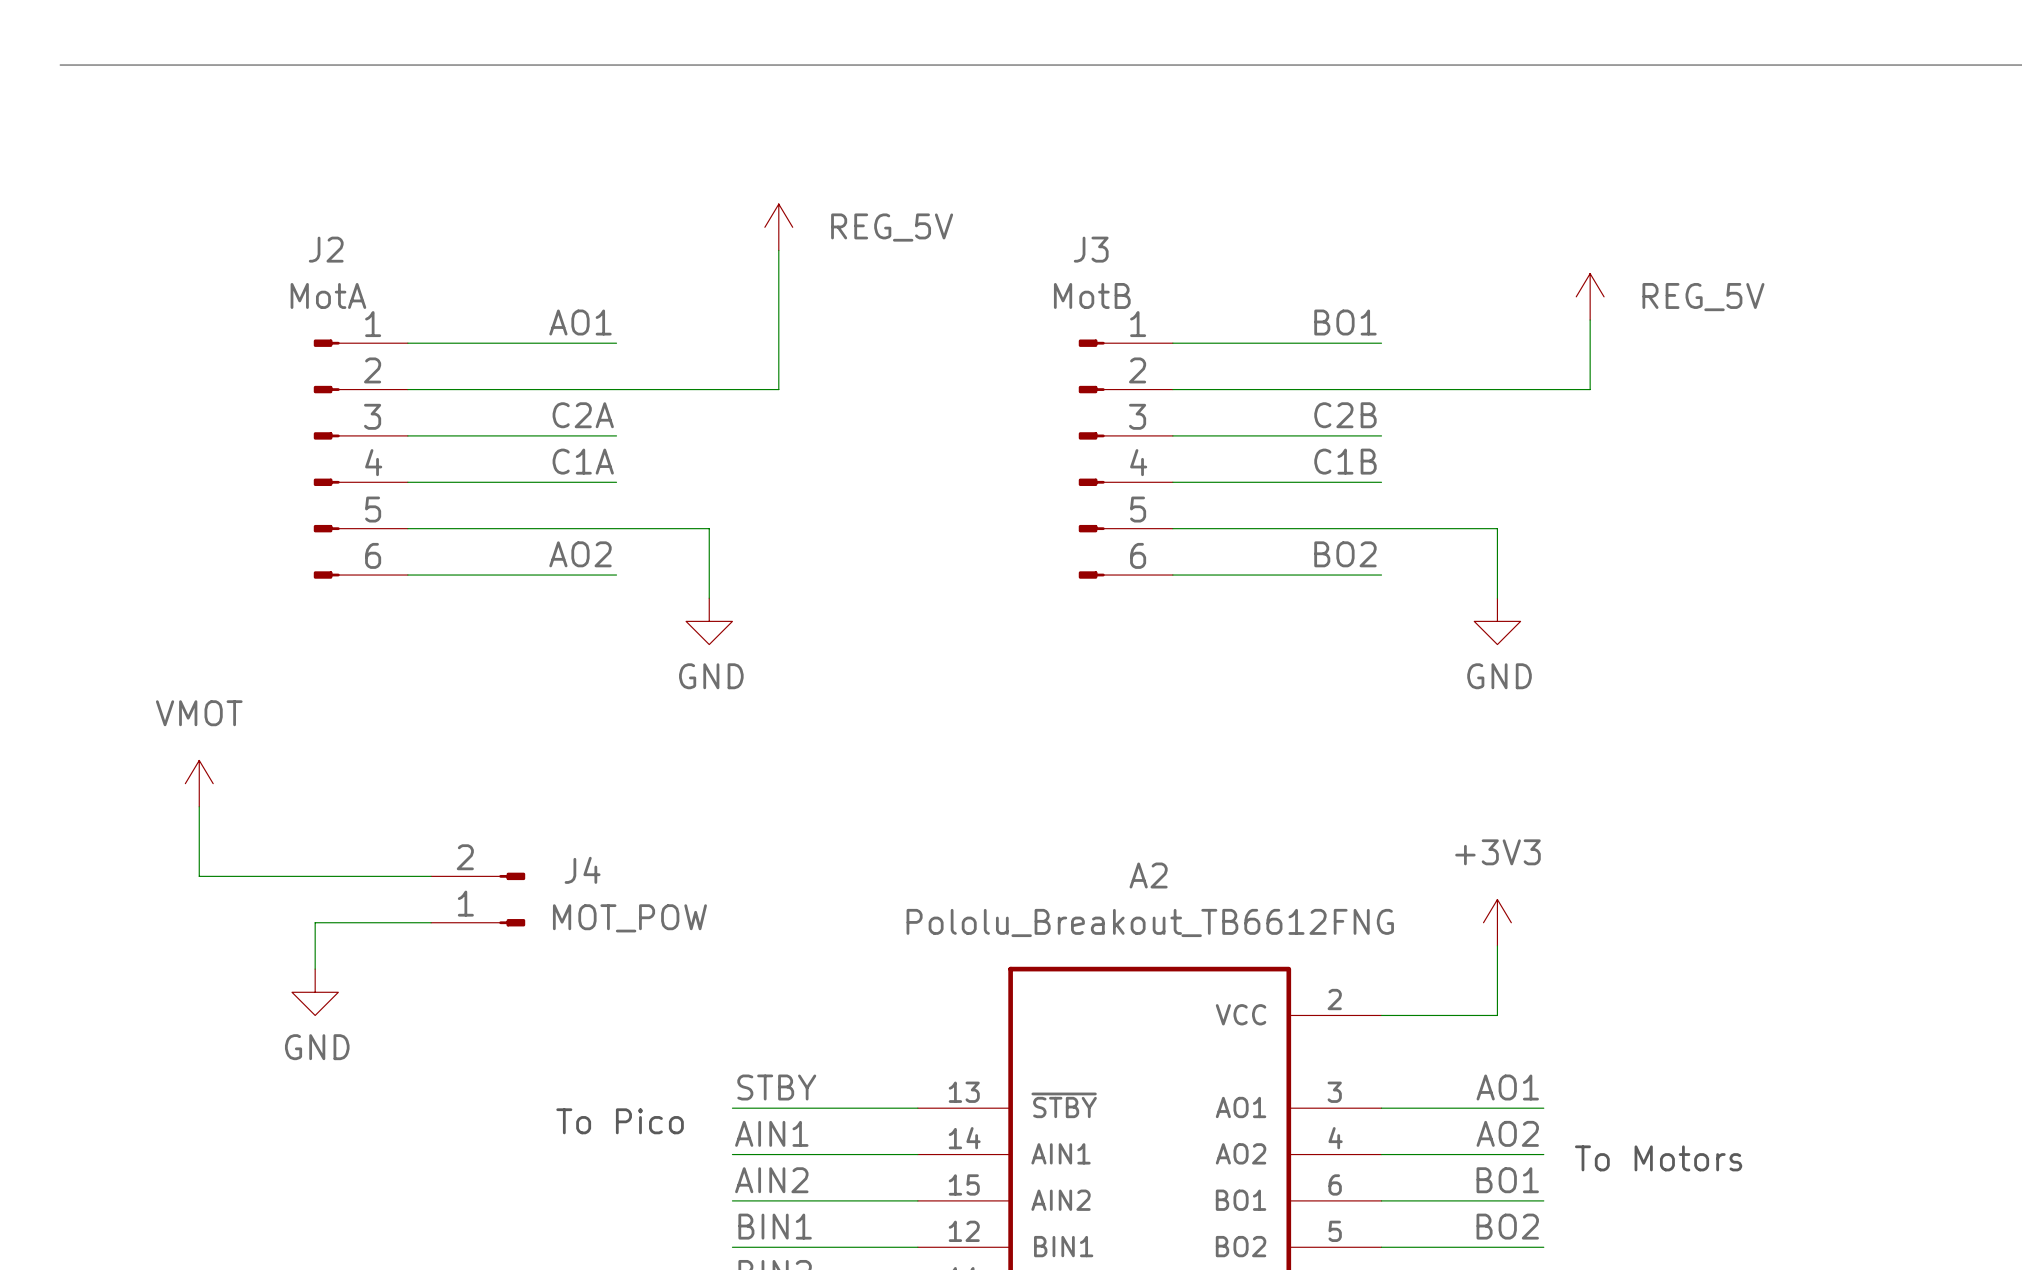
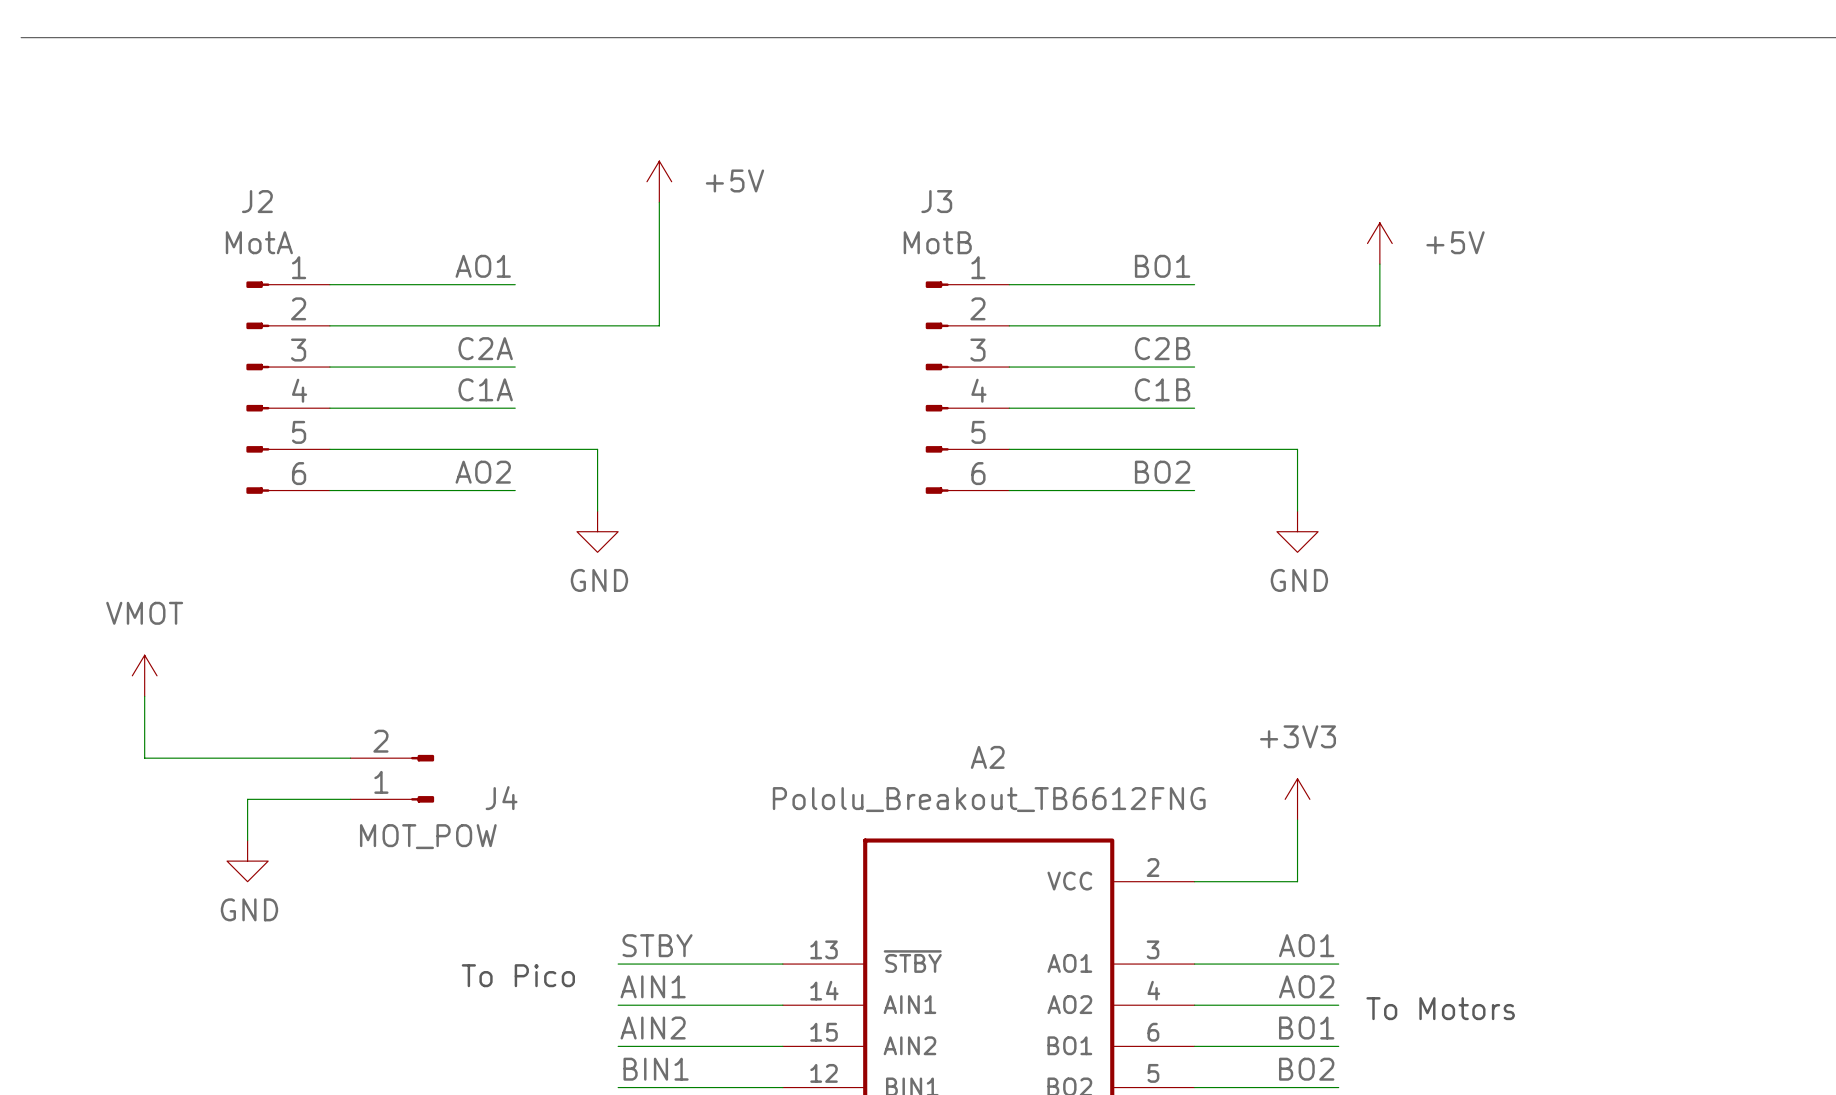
power symbol: REG_5V (778, 227) -> +5V (659, 181)
power symbol: REG_5V (1590, 296) -> +5V (1379, 243)
J4 name position: J4 (582, 870) -> J4 (501, 798)
J4 value position: MOT_POW (629, 918) -> MOT_POW (428, 836)

